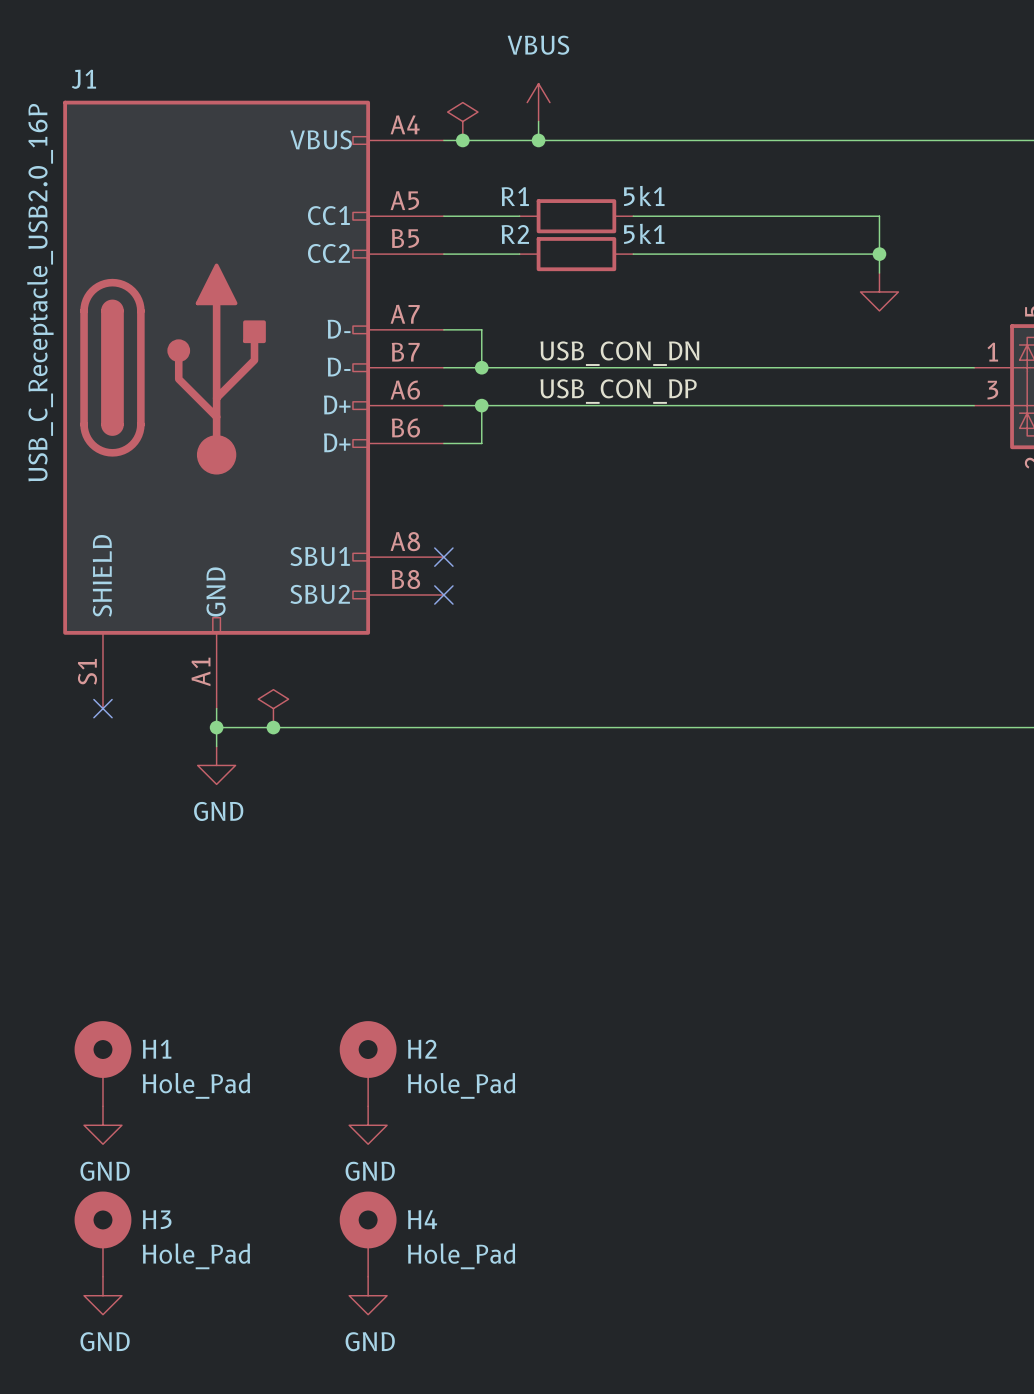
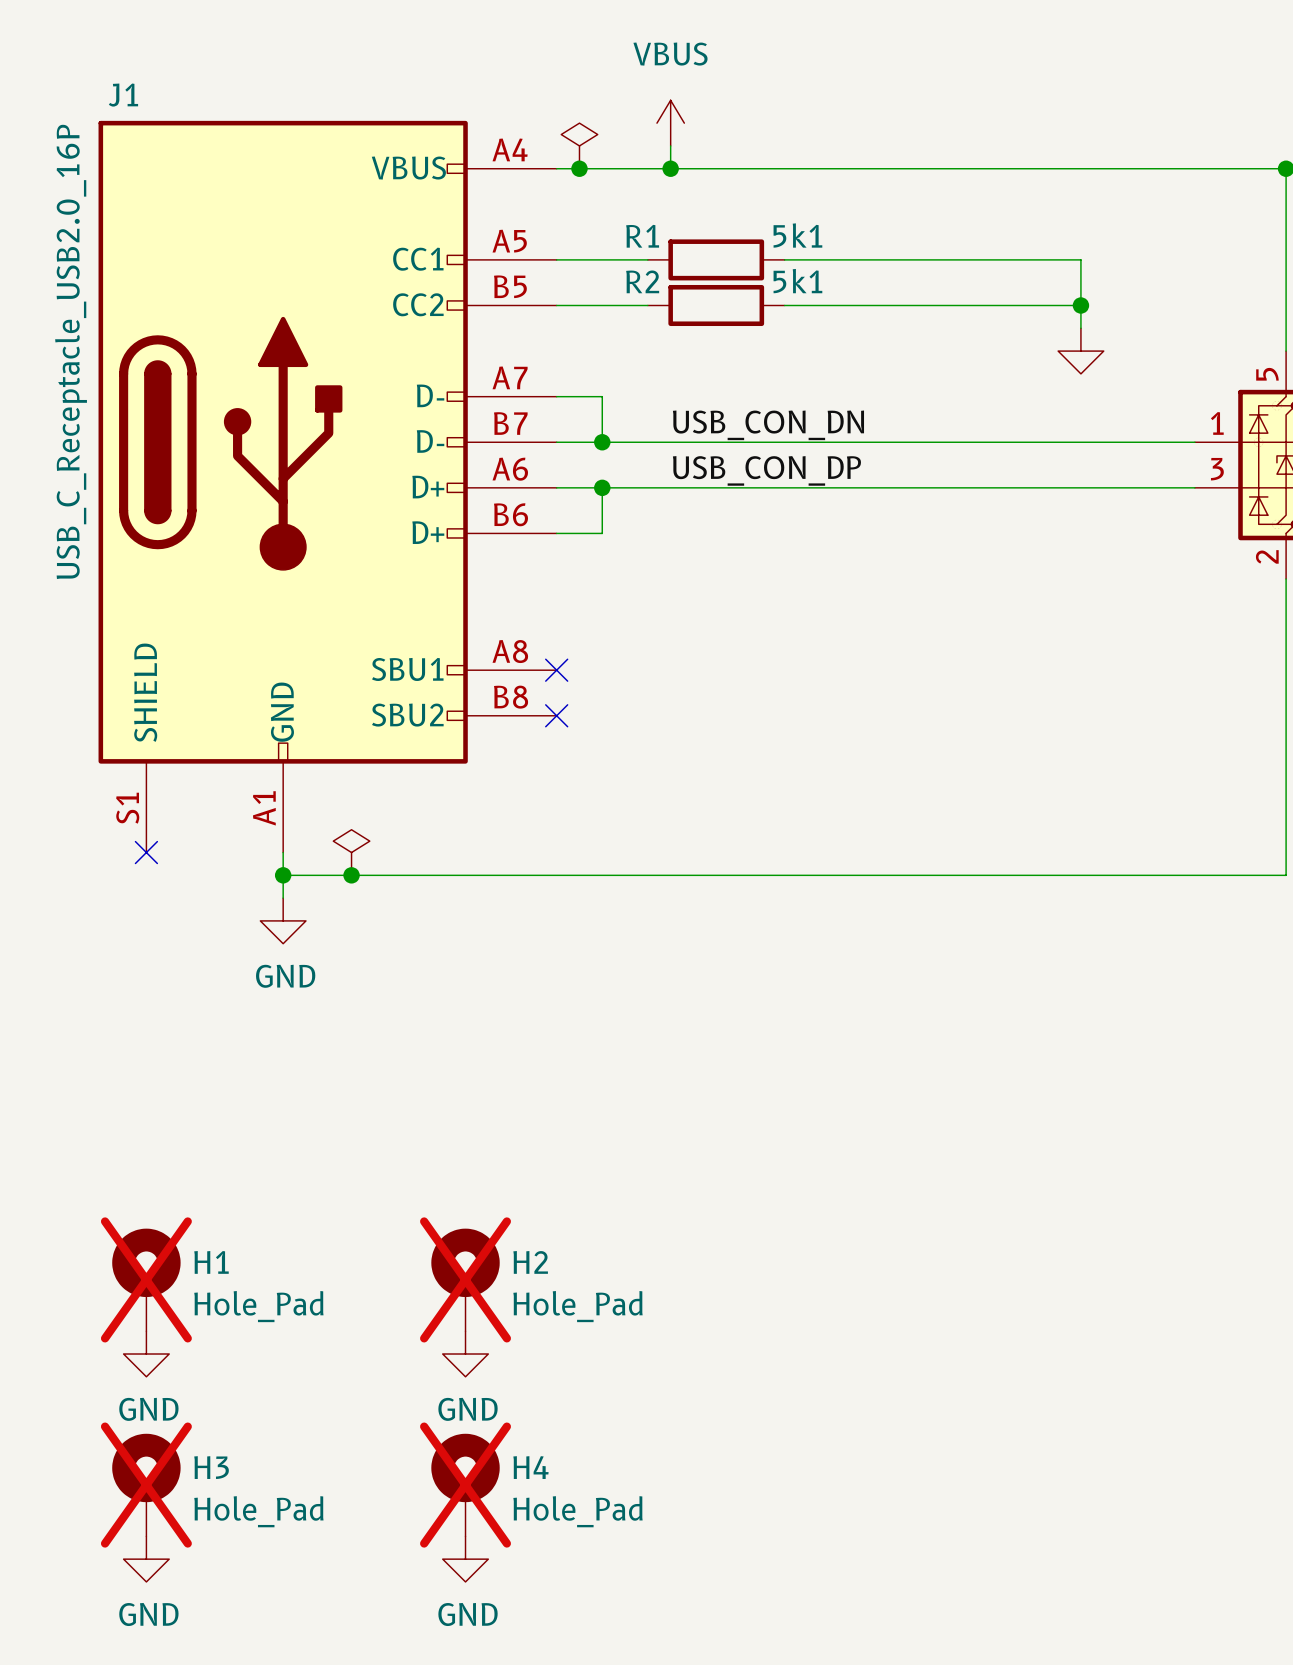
H1 do-not-place cross: none -> (146, 1279)
H2 do-not-place cross: none -> (465, 1279)
H3 do-not-place cross: none -> (146, 1485)
H4 do-not-place cross: none -> (465, 1485)

